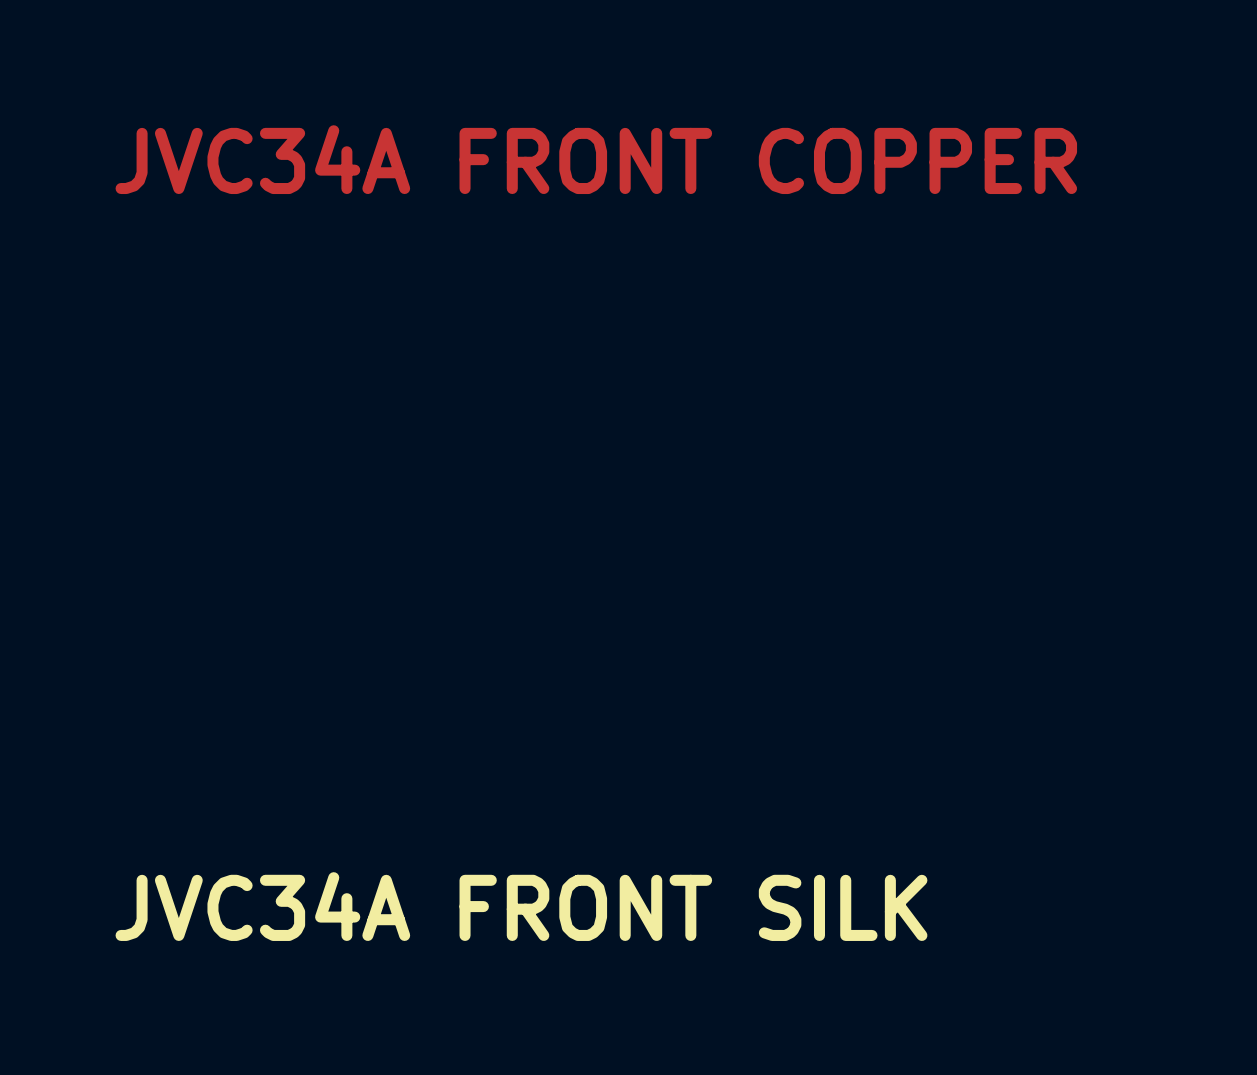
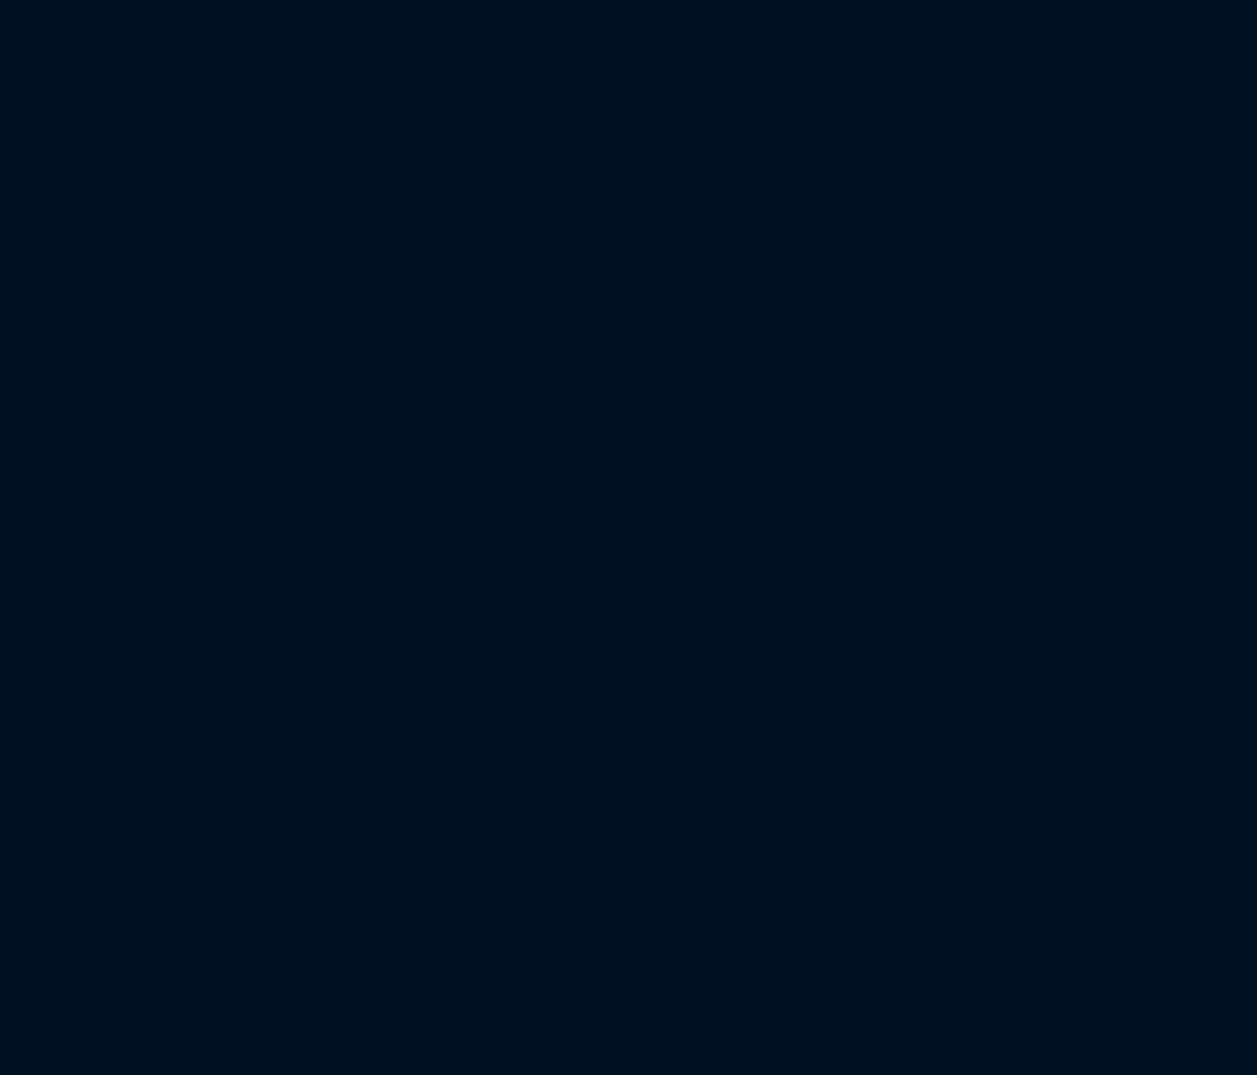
text: JVC34A FRONT COPPER (596, 159) -> none
text: JVC34A FRONT SILK (521, 906) -> none

